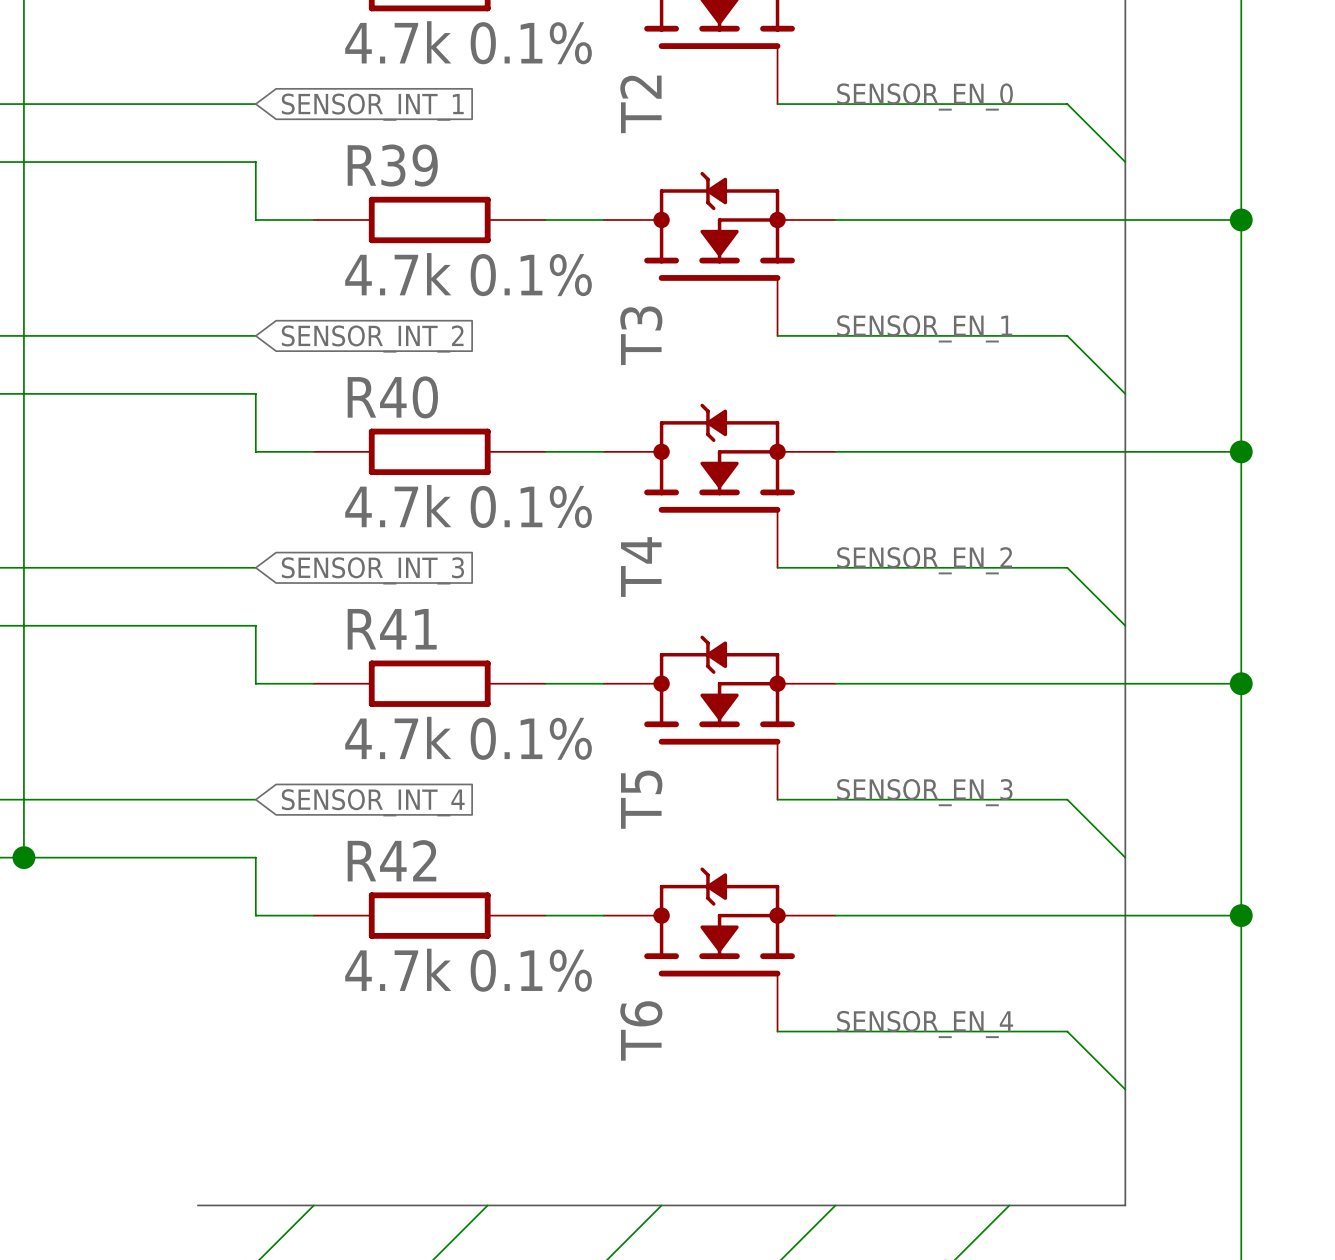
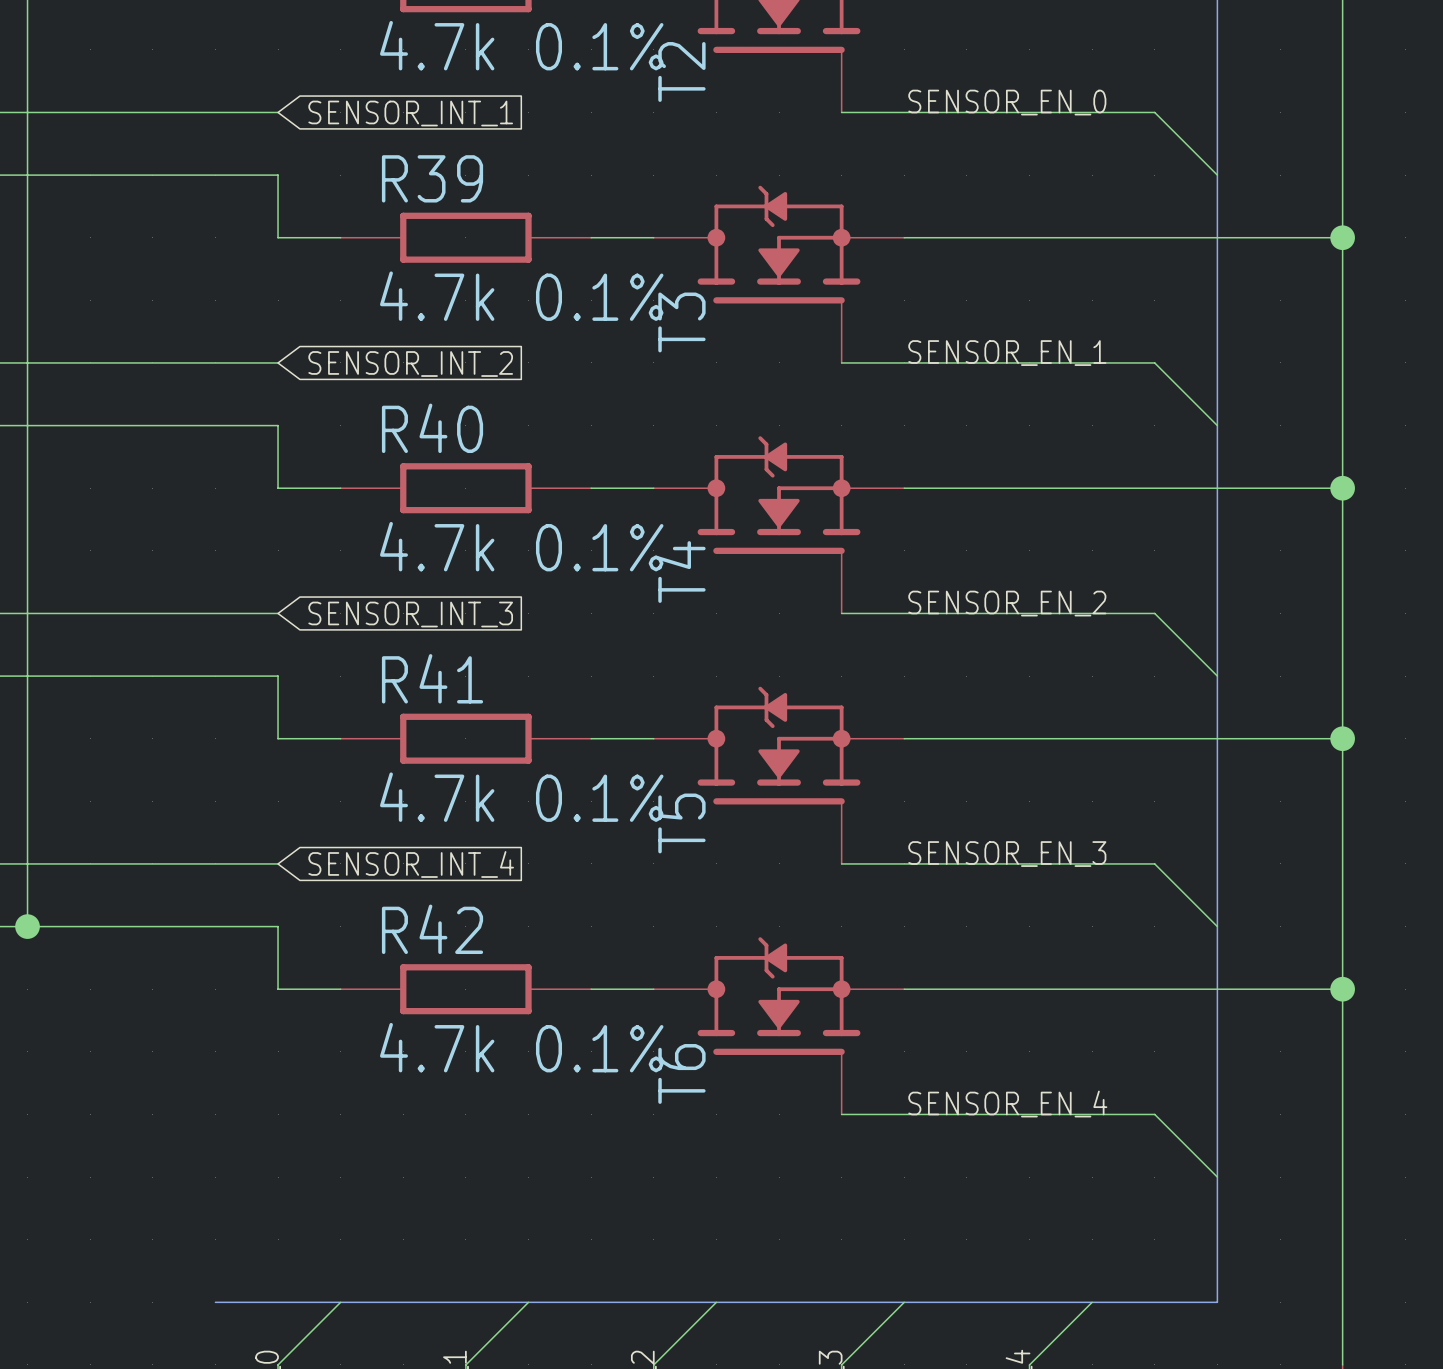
T2 name position: T2 (640, 104) -> T2 (681, 71)
T3 name position: T3 (641, 335) -> T3 (681, 322)
T4 name position: T4 (641, 567) -> T4 (680, 572)
T5 name position: T5 (641, 799) -> T5 (681, 823)
T6 name position: T6 (641, 1030) -> T6 (681, 1073)

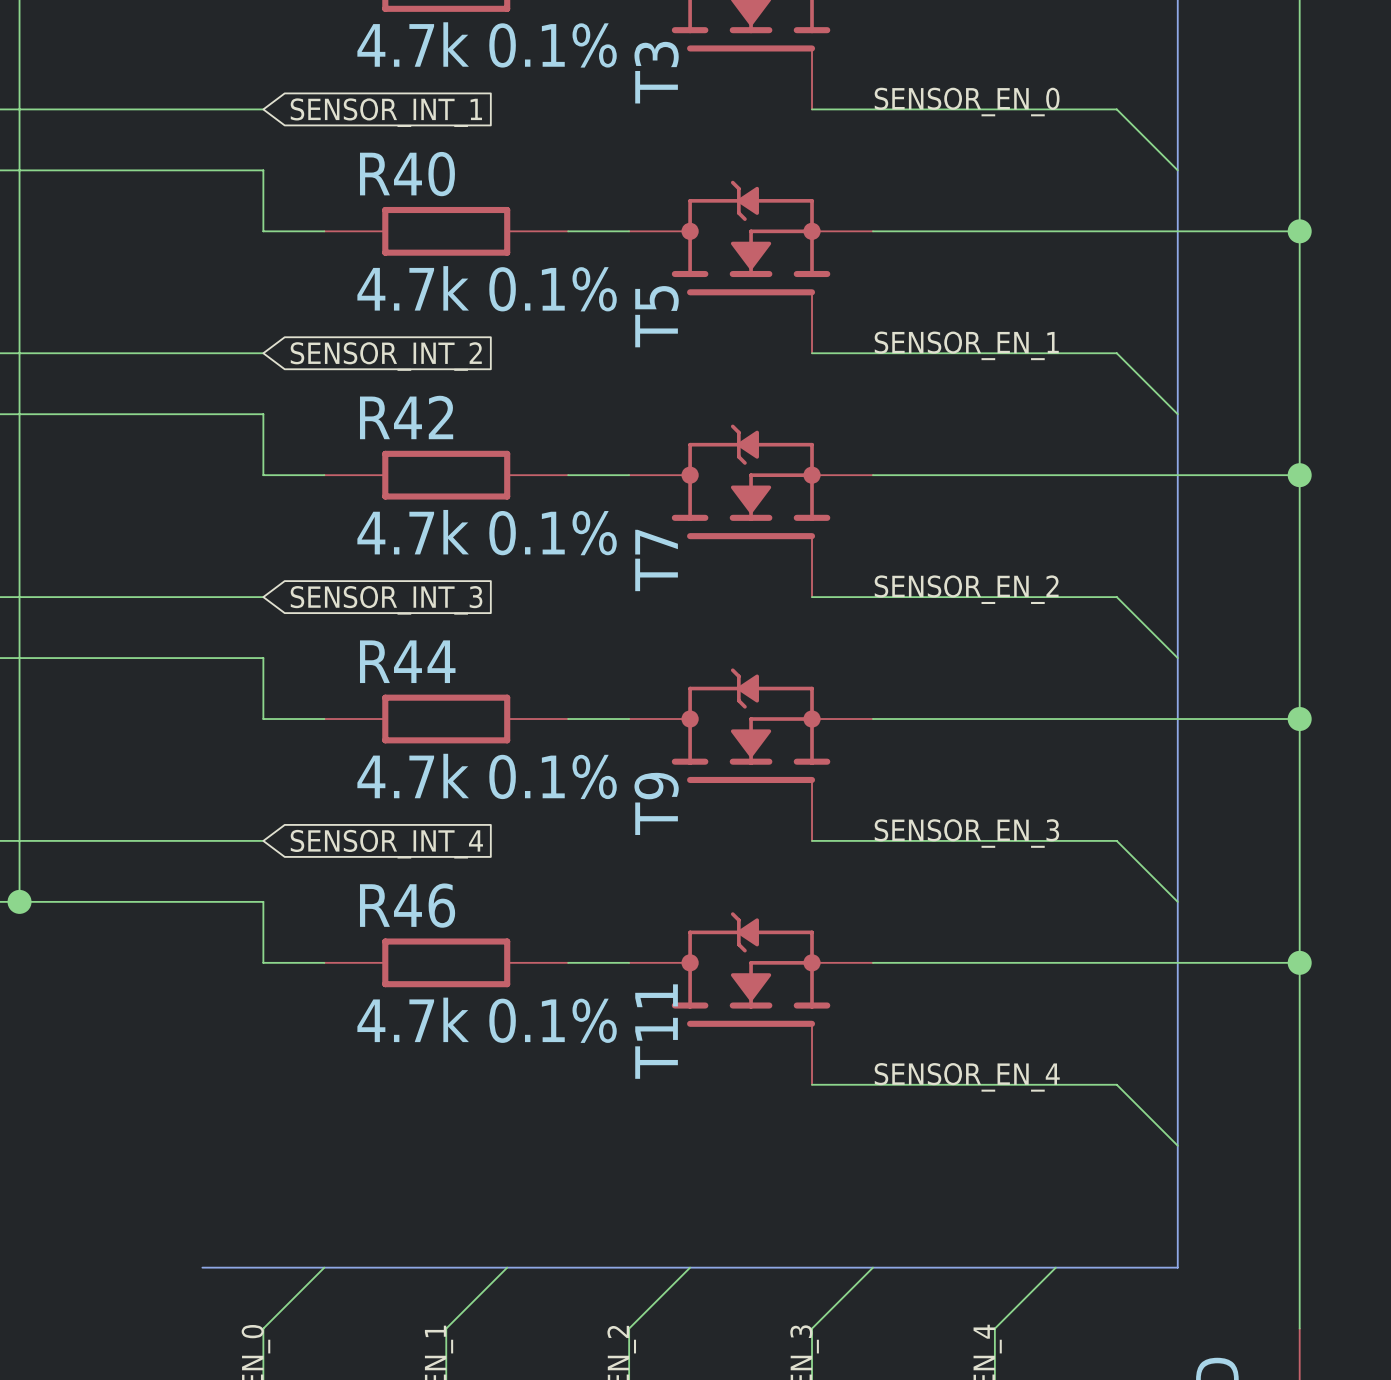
T2 name: T2 (681, 71) -> T3 (656, 72)
R39 name: R39 (432, 178) -> R40 (407, 174)
T3 name: T3 (681, 322) -> T5 (656, 316)
R40 name: R40 (432, 428) -> R42 (406, 417)
T4 name: T4 (680, 572) -> T7 (656, 560)
R41 name: R41 (432, 678) -> R44 (407, 661)
T5 name: T5 (681, 823) -> T9 (656, 803)
R42 name: R42 (432, 929) -> R46 (407, 905)
T6 name: T6 (681, 1073) -> T11 (656, 1031)

